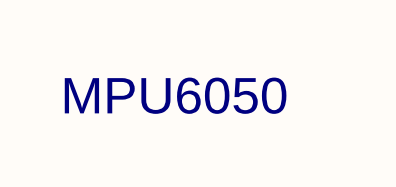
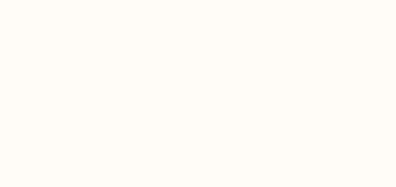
text: MPU6050 (175, 95) -> none

